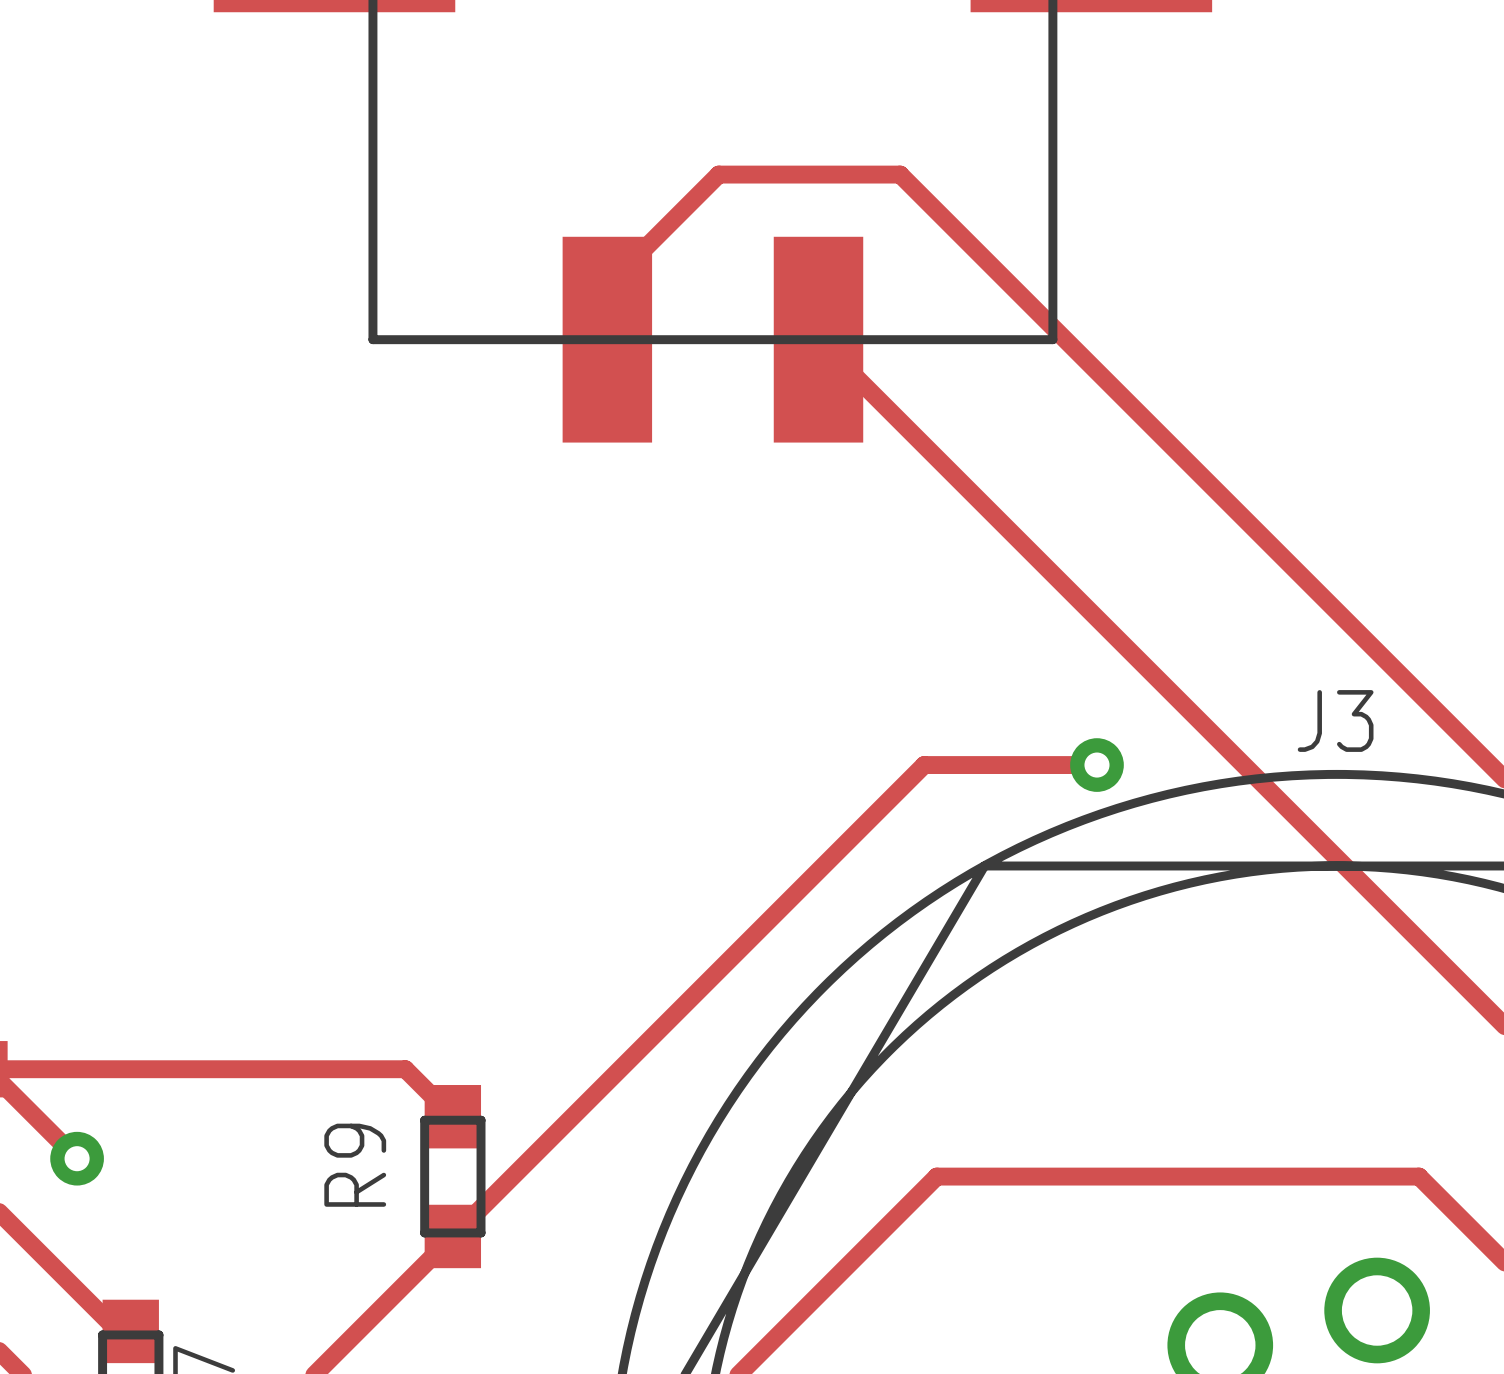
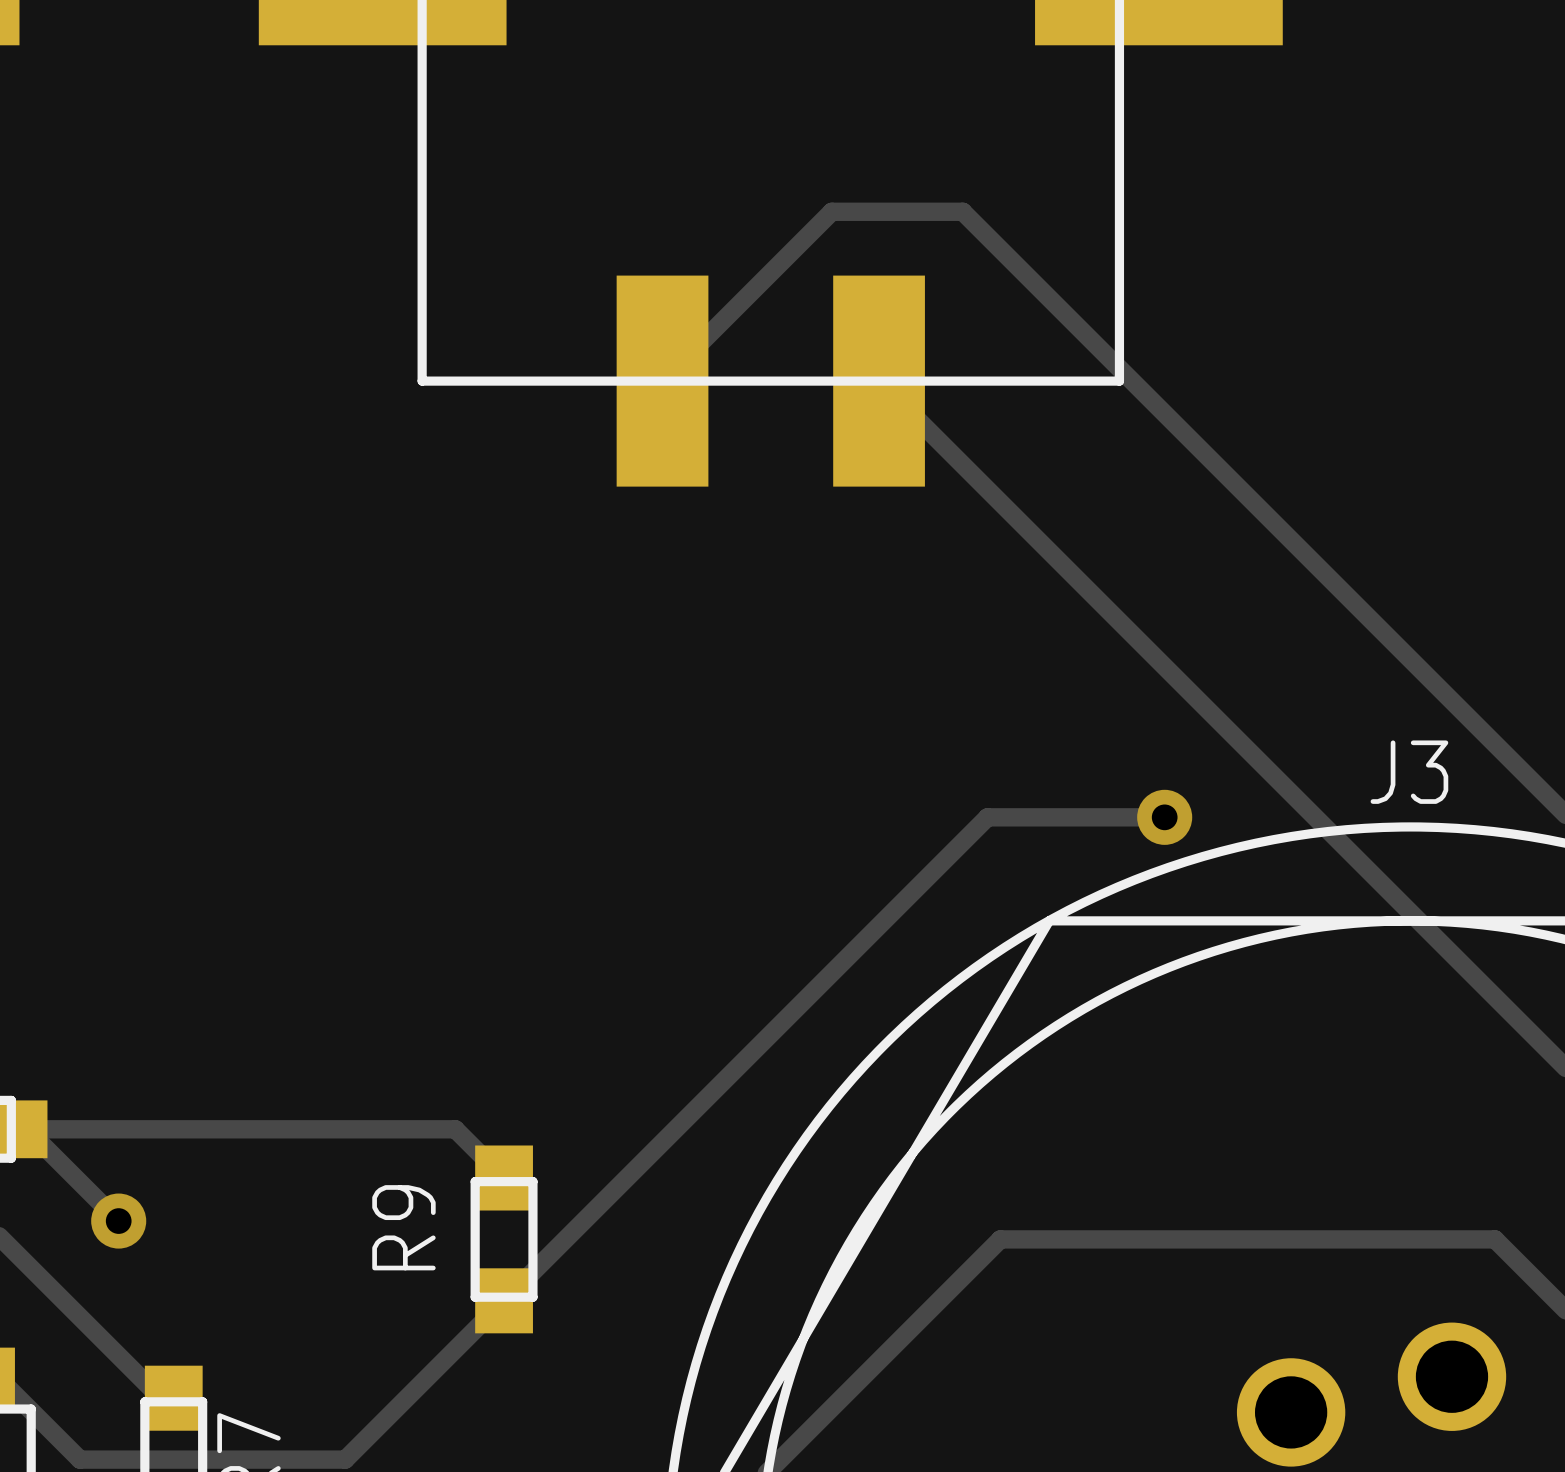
track: (772, 174) (718, 174) (607, 285) (607, 339) -> (831, 211) (662, 381)

